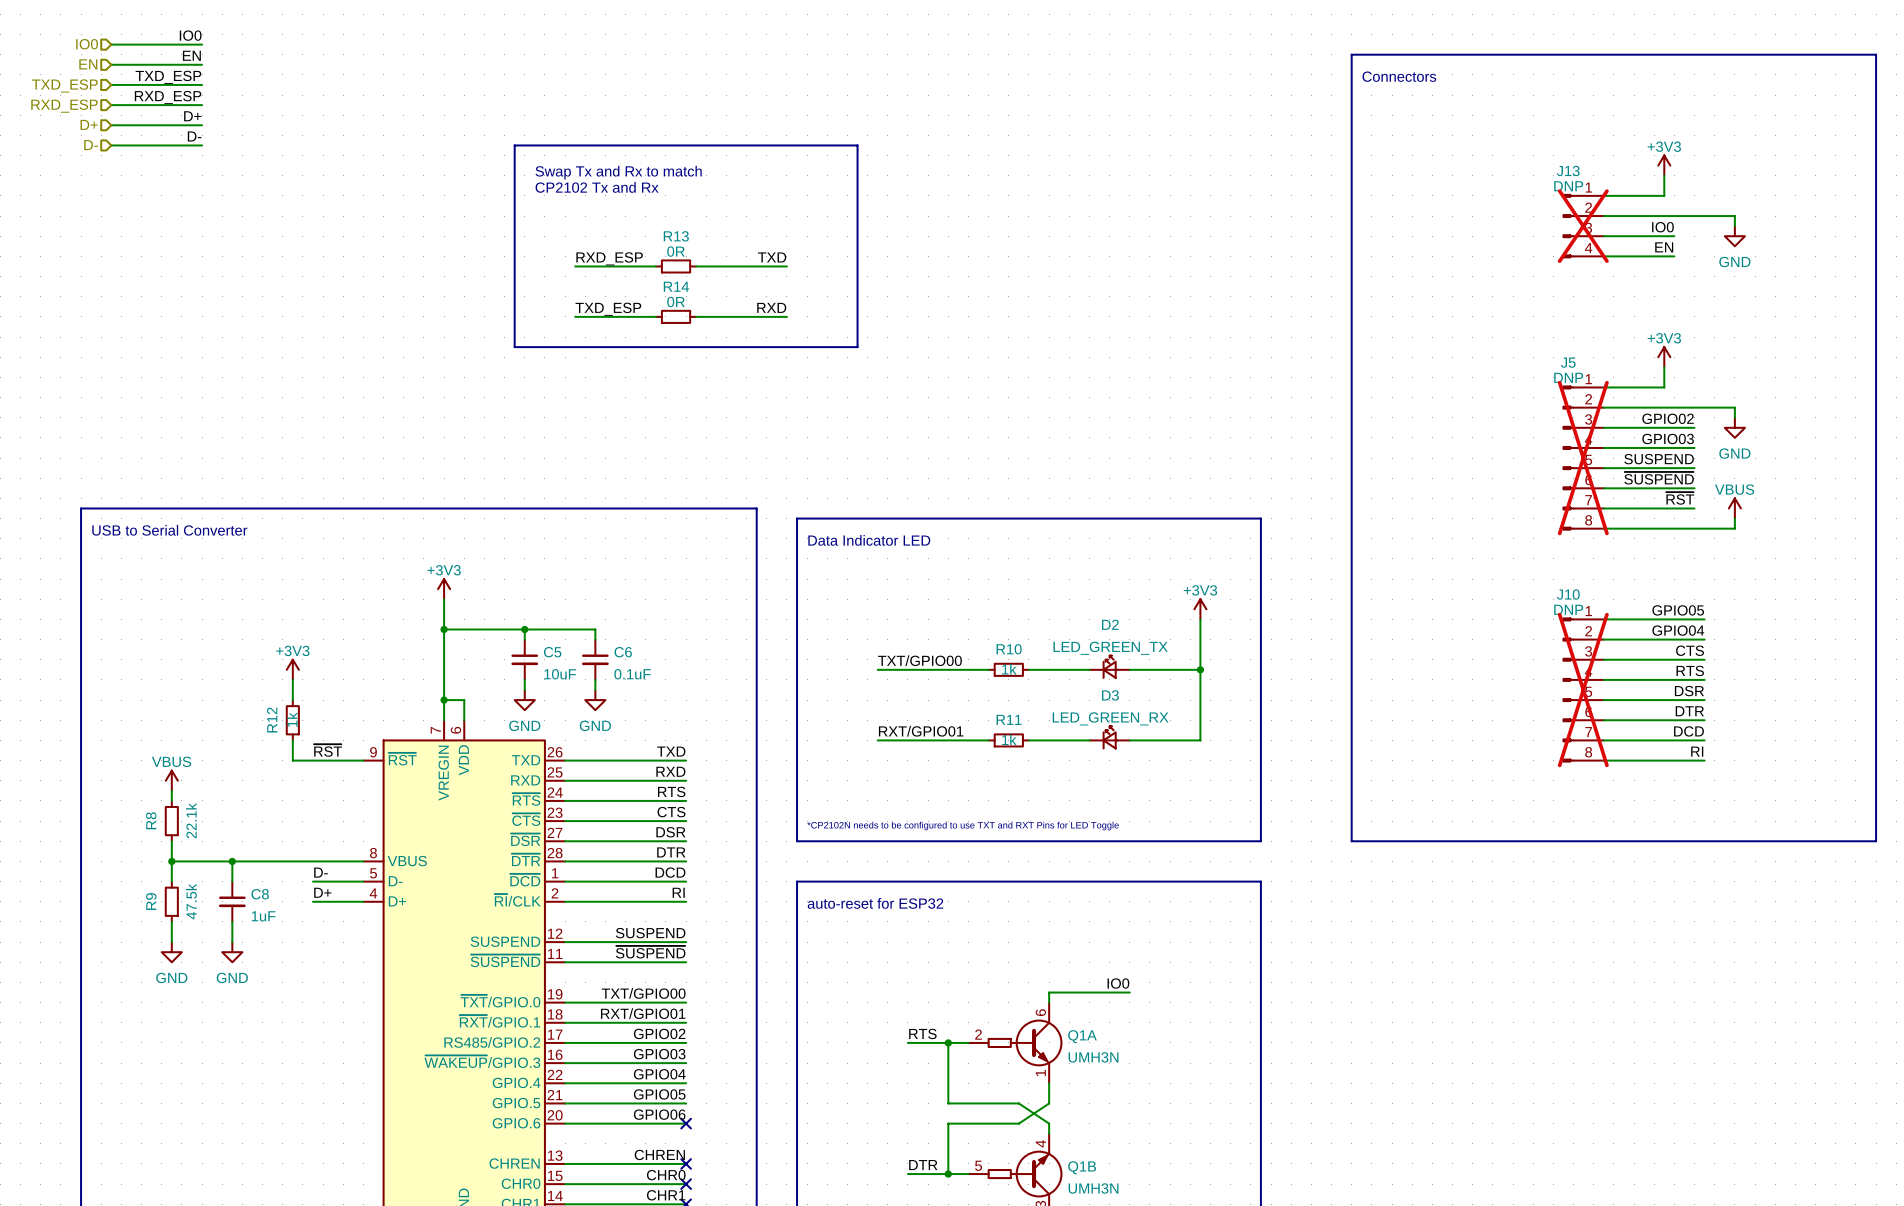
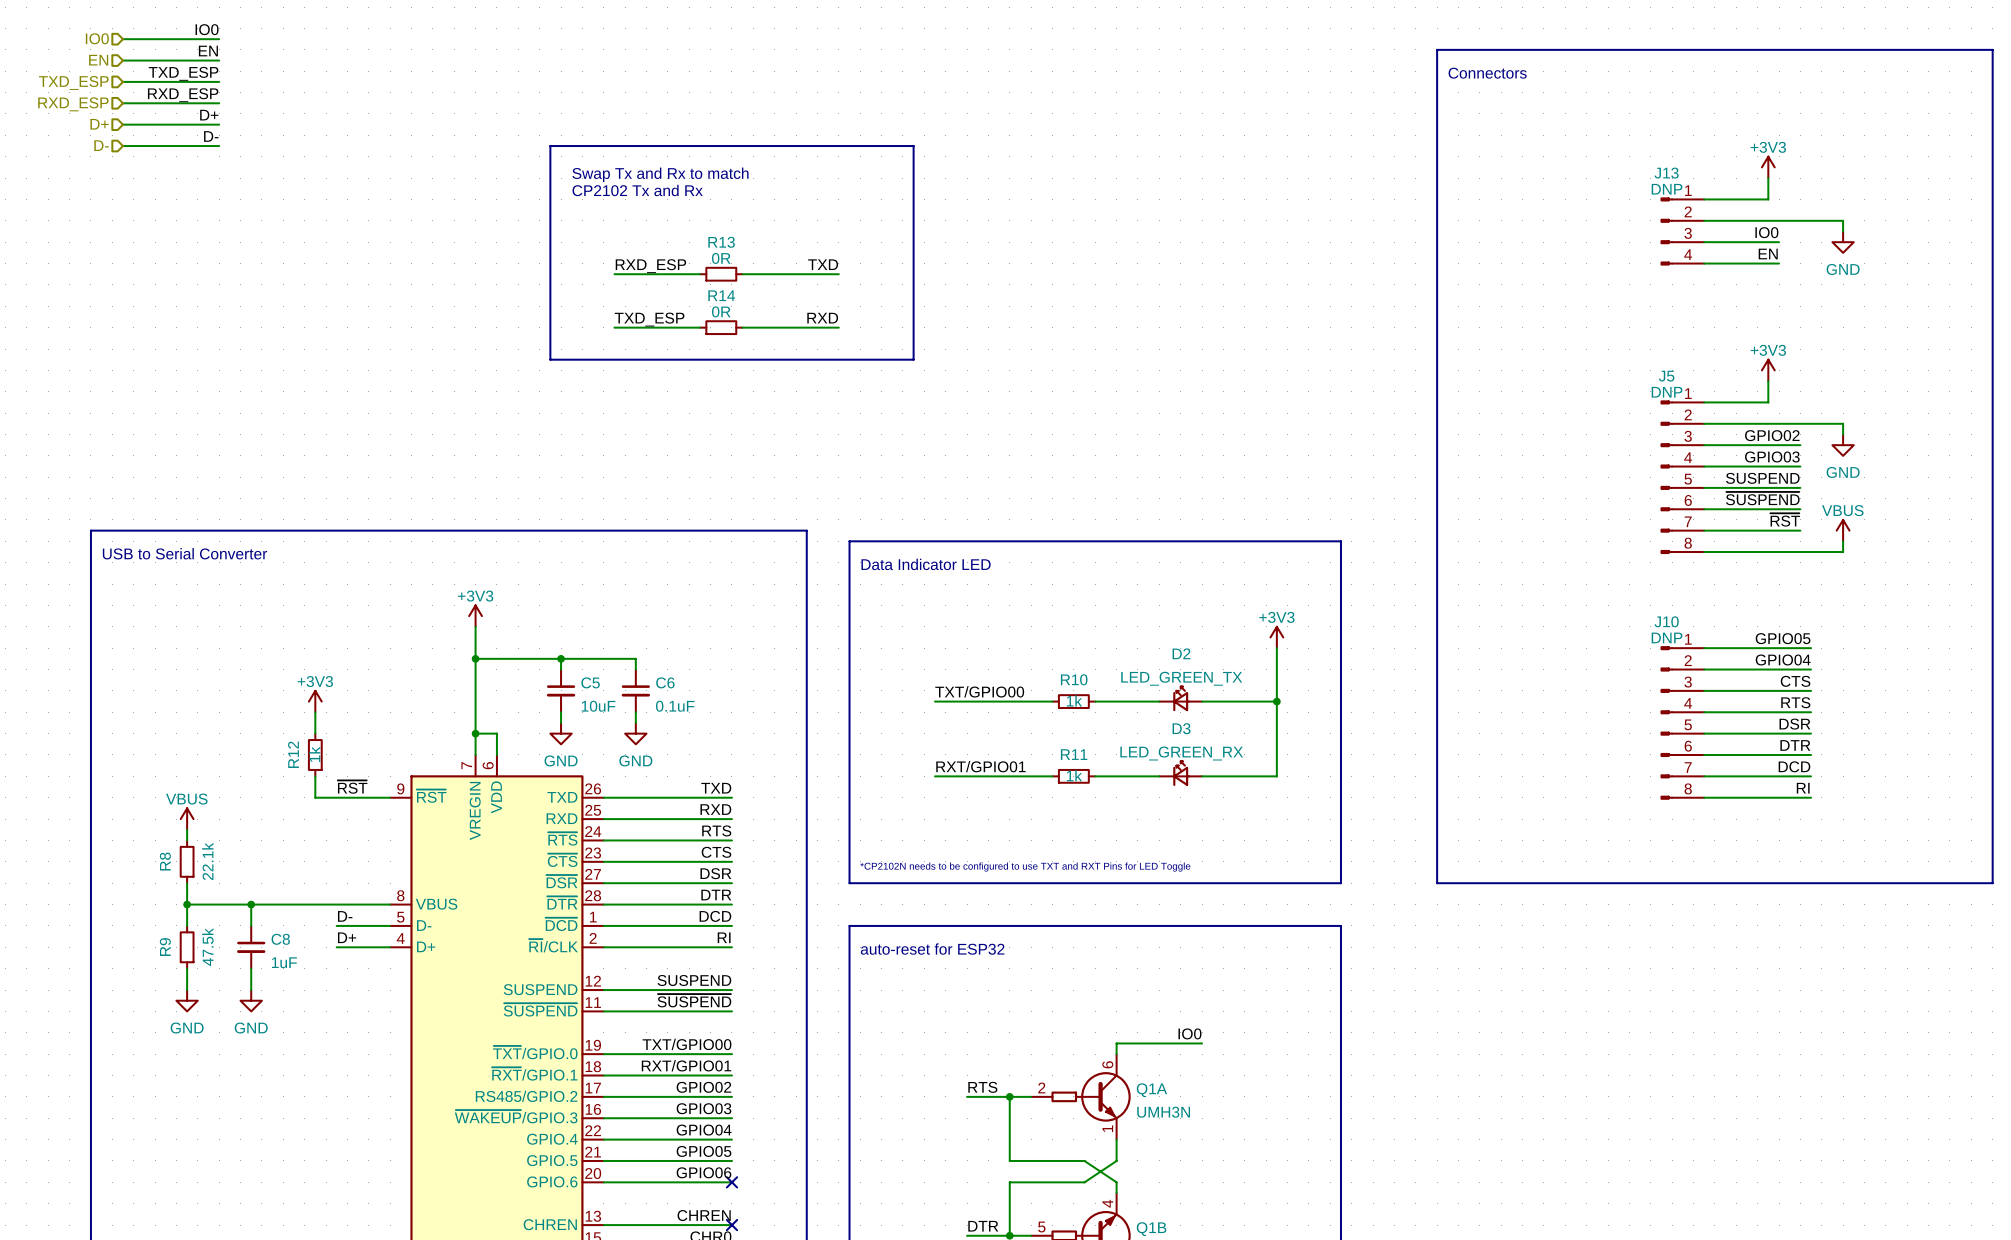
J13 do-not-place cross: (1583, 226) -> none
J5 do-not-place cross: (1583, 458) -> none
J10 do-not-place cross: (1583, 690) -> none

